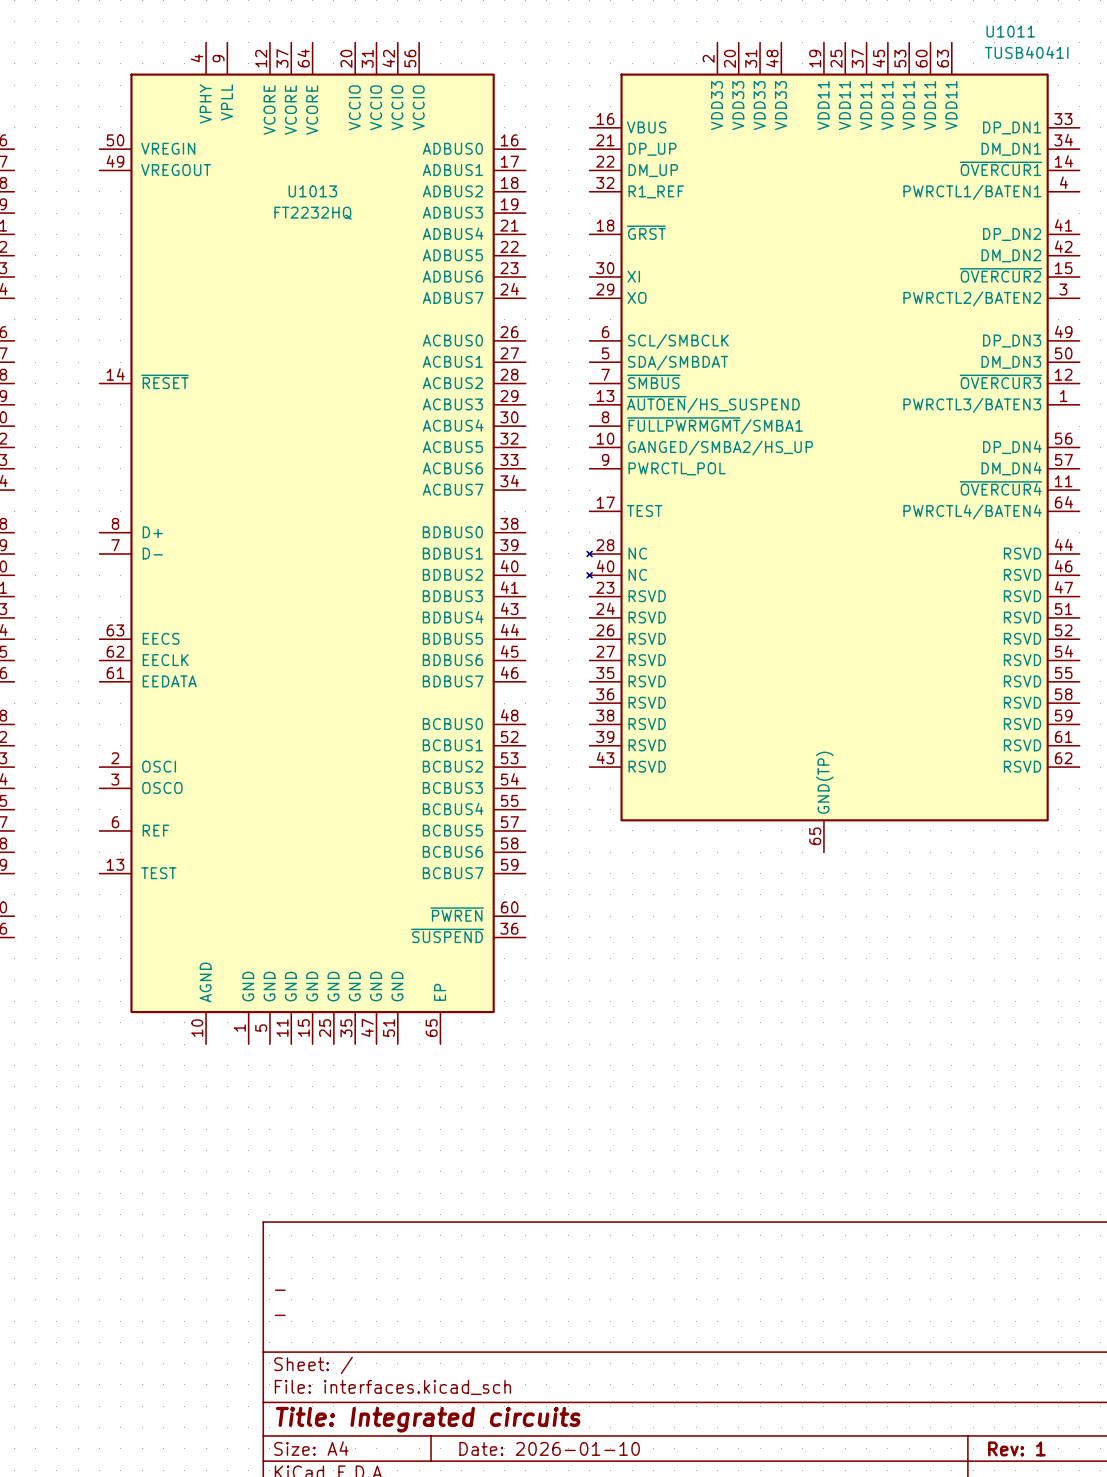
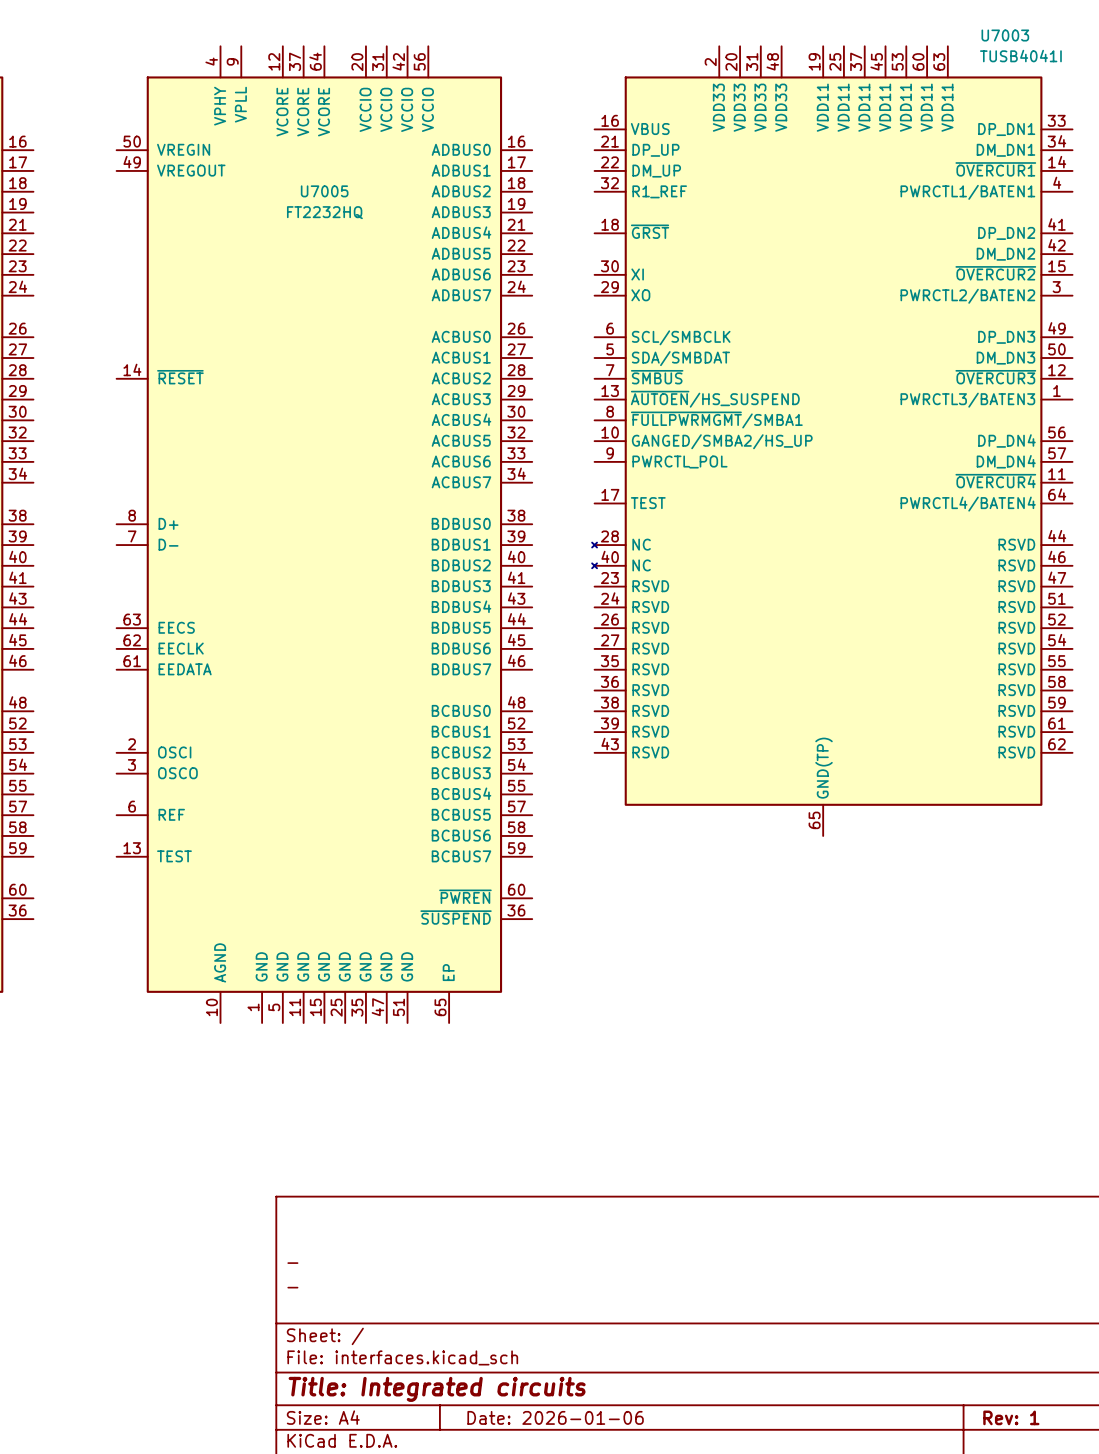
U1011 name: U1011 (1010, 31) -> U7003 (1005, 35)
U1013 name: U1013 (312, 191) -> U7005 (324, 191)
title block: Date: 2026-01-10 (549, 1448) -> Date: 2026-01-06 (555, 1417)

